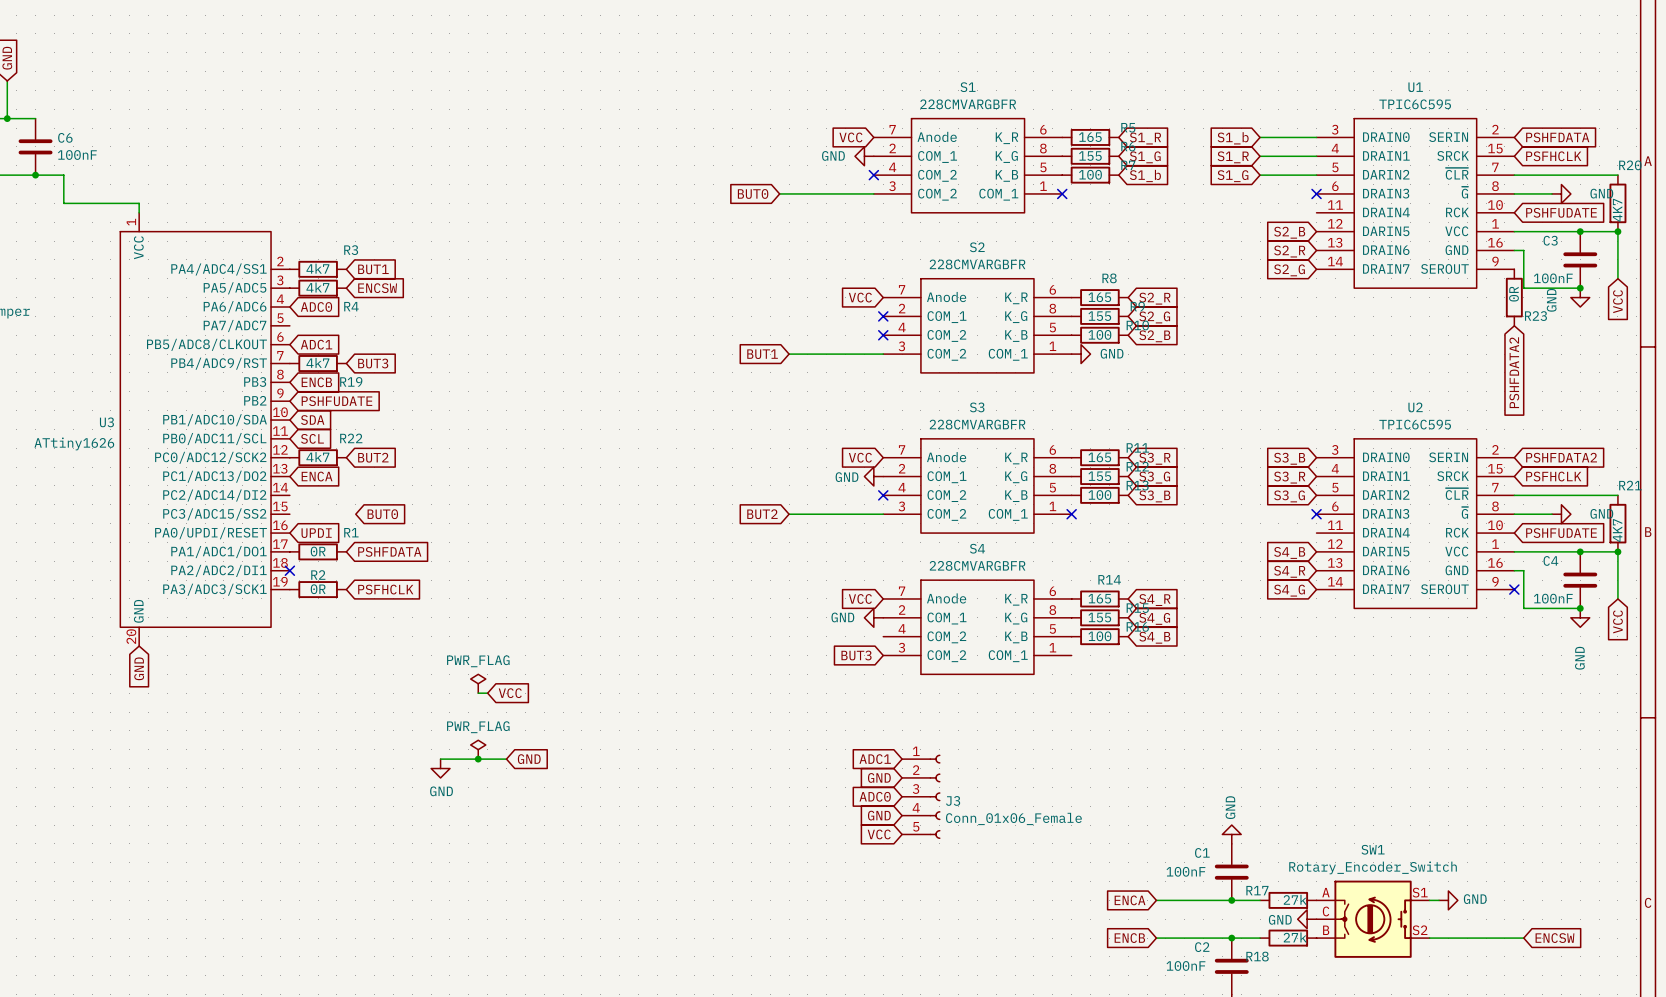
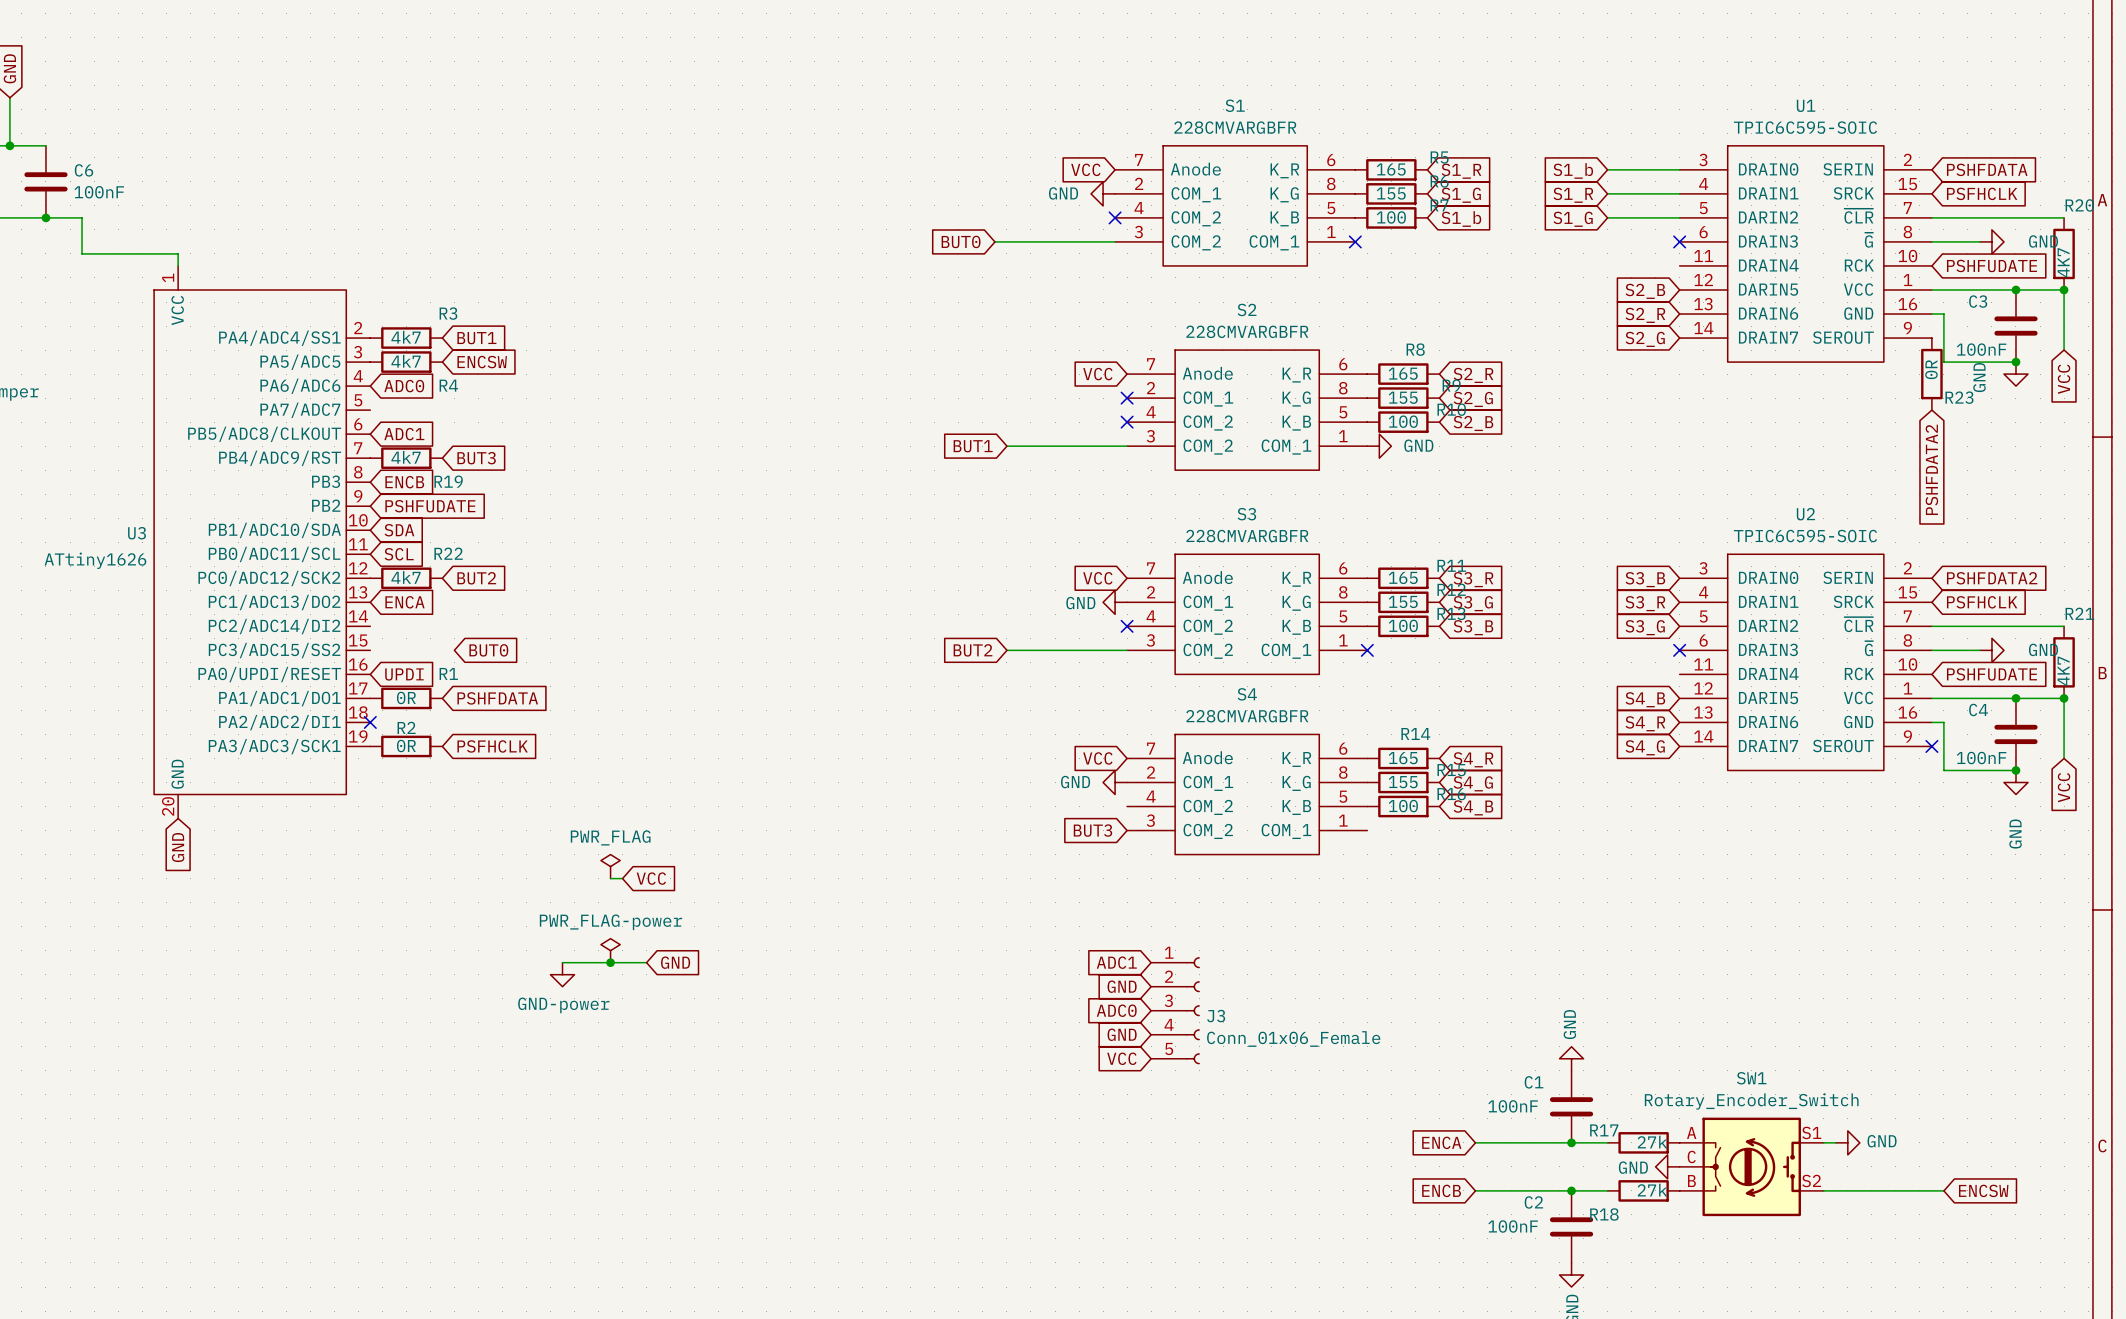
U1 value: TPIC6C595 (1415, 104) -> TPIC6C595-SOIC (1805, 127)
U2 value: TPIC6C595 (1415, 424) -> TPIC6C595-SOIC (1805, 536)
power symbol: PWR_FLAG (478, 749) -> PWR_FLAG-power (610, 950)
power symbol: GND (440, 768) -> GND-power (562, 974)

